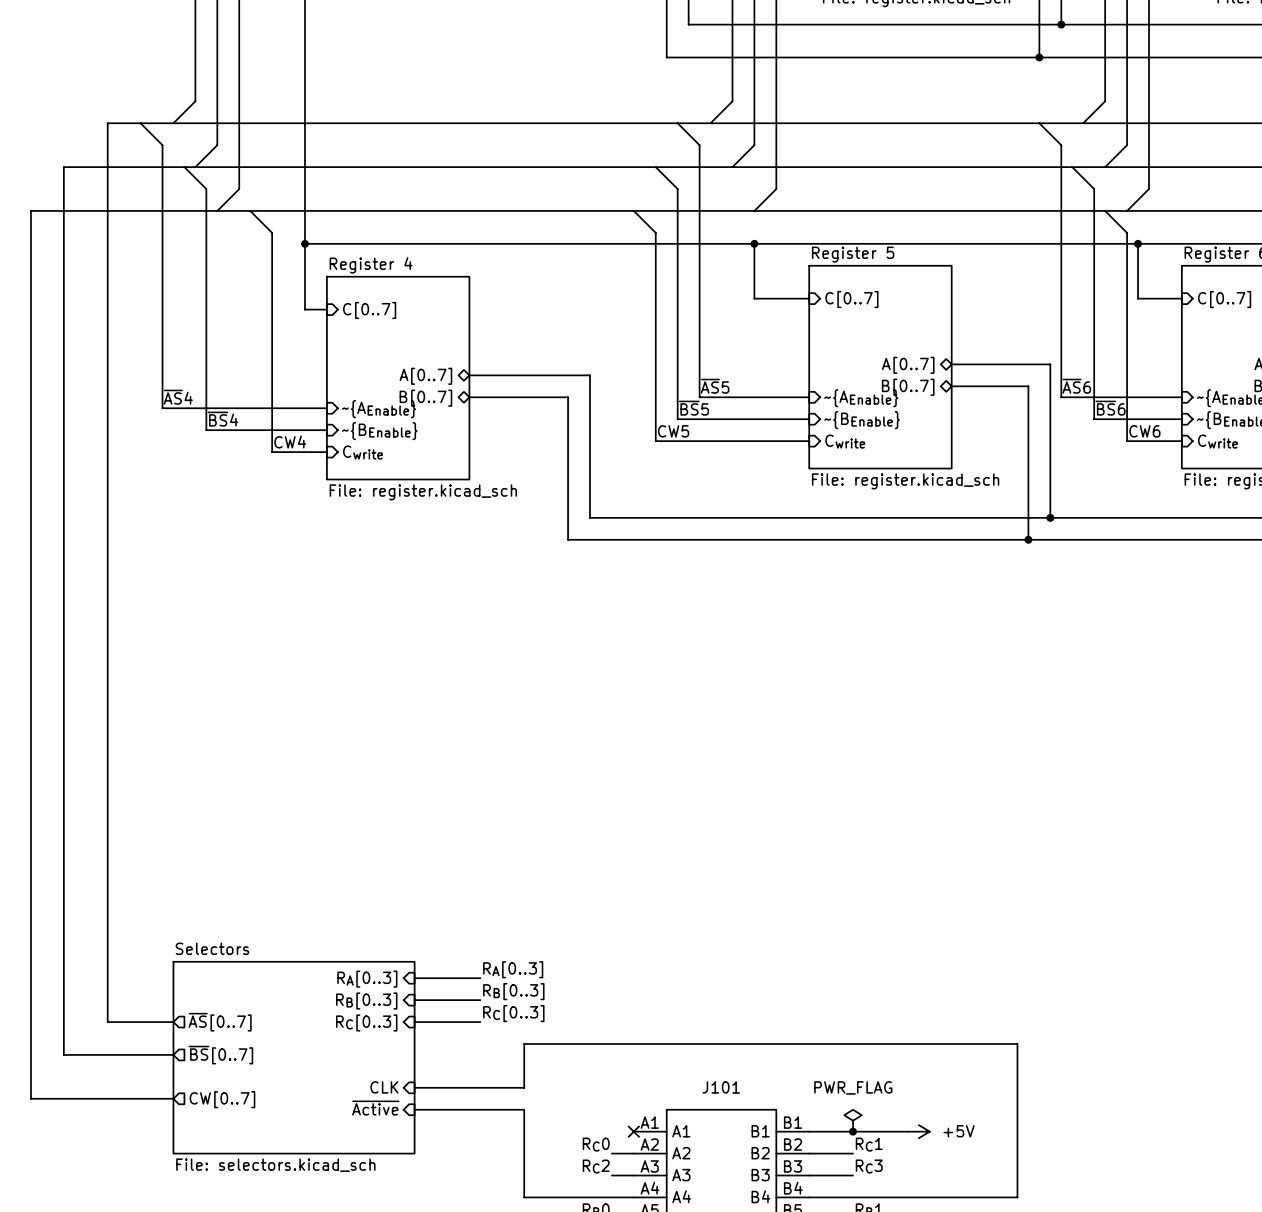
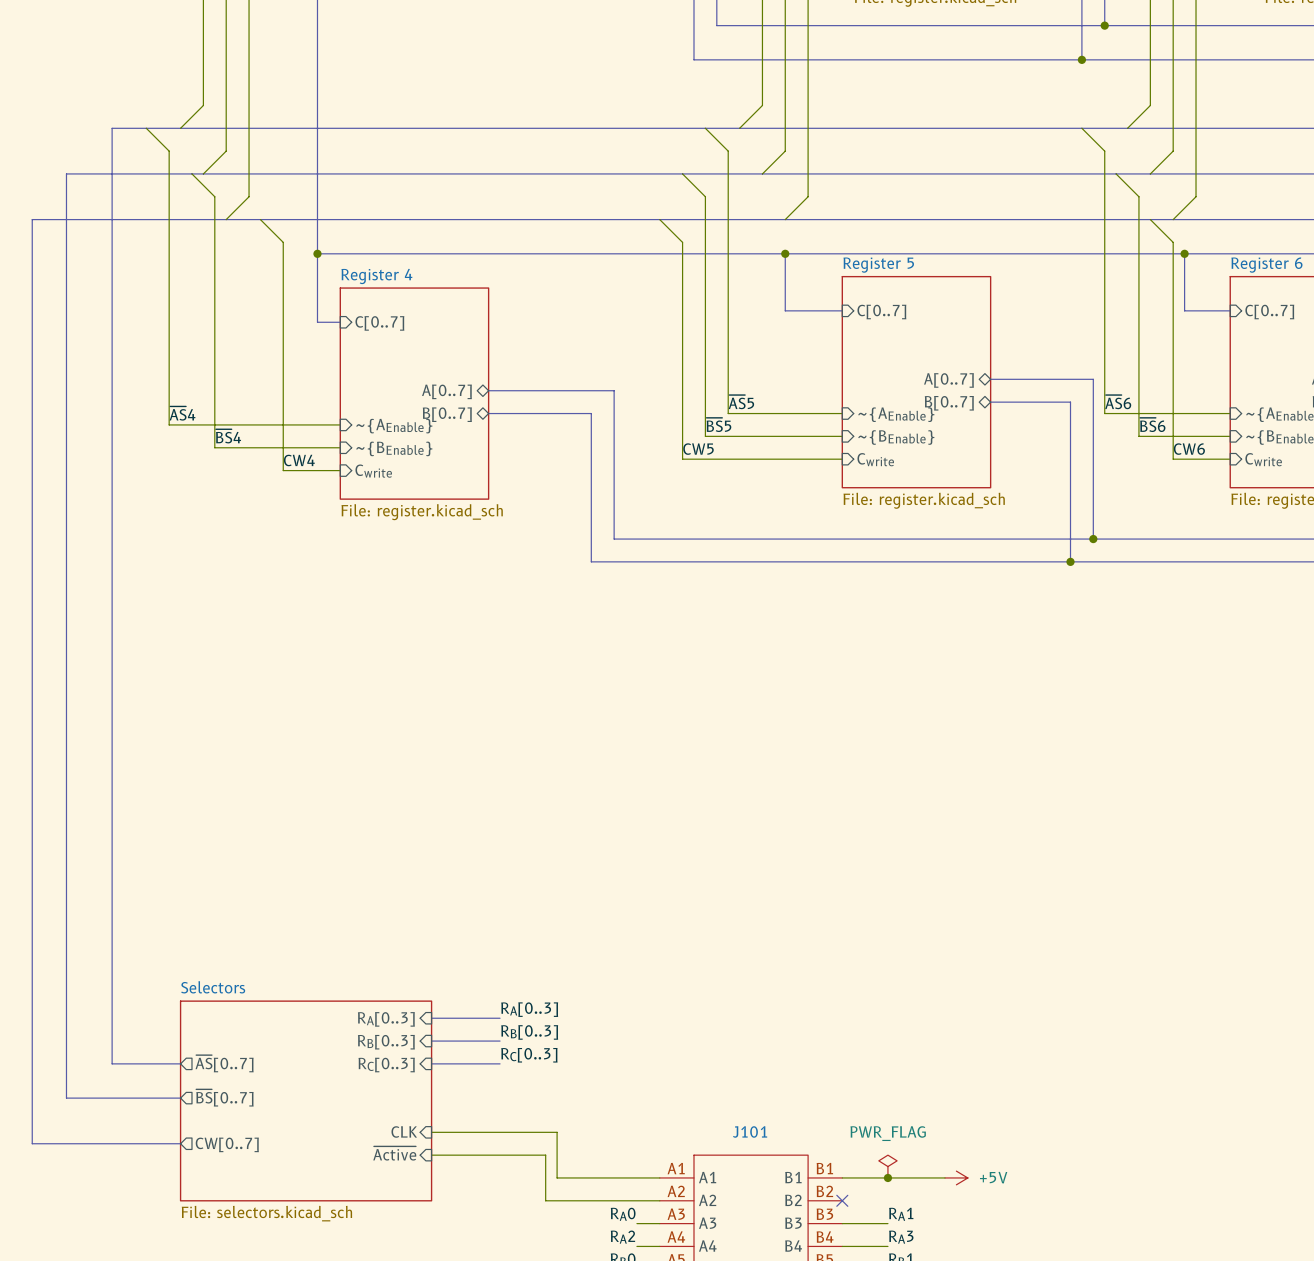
wire: (524, 1087) (524, 1043) (1017, 1043) (1017, 1197) (853, 1197) -> (545, 1132) (557, 1132) (557, 1177) (659, 1177)
no-connect mark: (633, 1131) -> none
label: RC0 (596, 1144) -> none
label: RC1 (869, 1144) -> none
wire: (524, 1153) (524, 1197) (611, 1197) -> (545, 1200) (636, 1200)
wire: (809, 1153) (853, 1153) -> none
no-connect mark: none -> (842, 1200)
label: RC2 (596, 1166) -> RA0 (623, 1214)
label: RC3 (869, 1166) -> RA1 (901, 1214)
label: none -> RA2 (622, 1237)
label: none -> RA3 (901, 1237)

